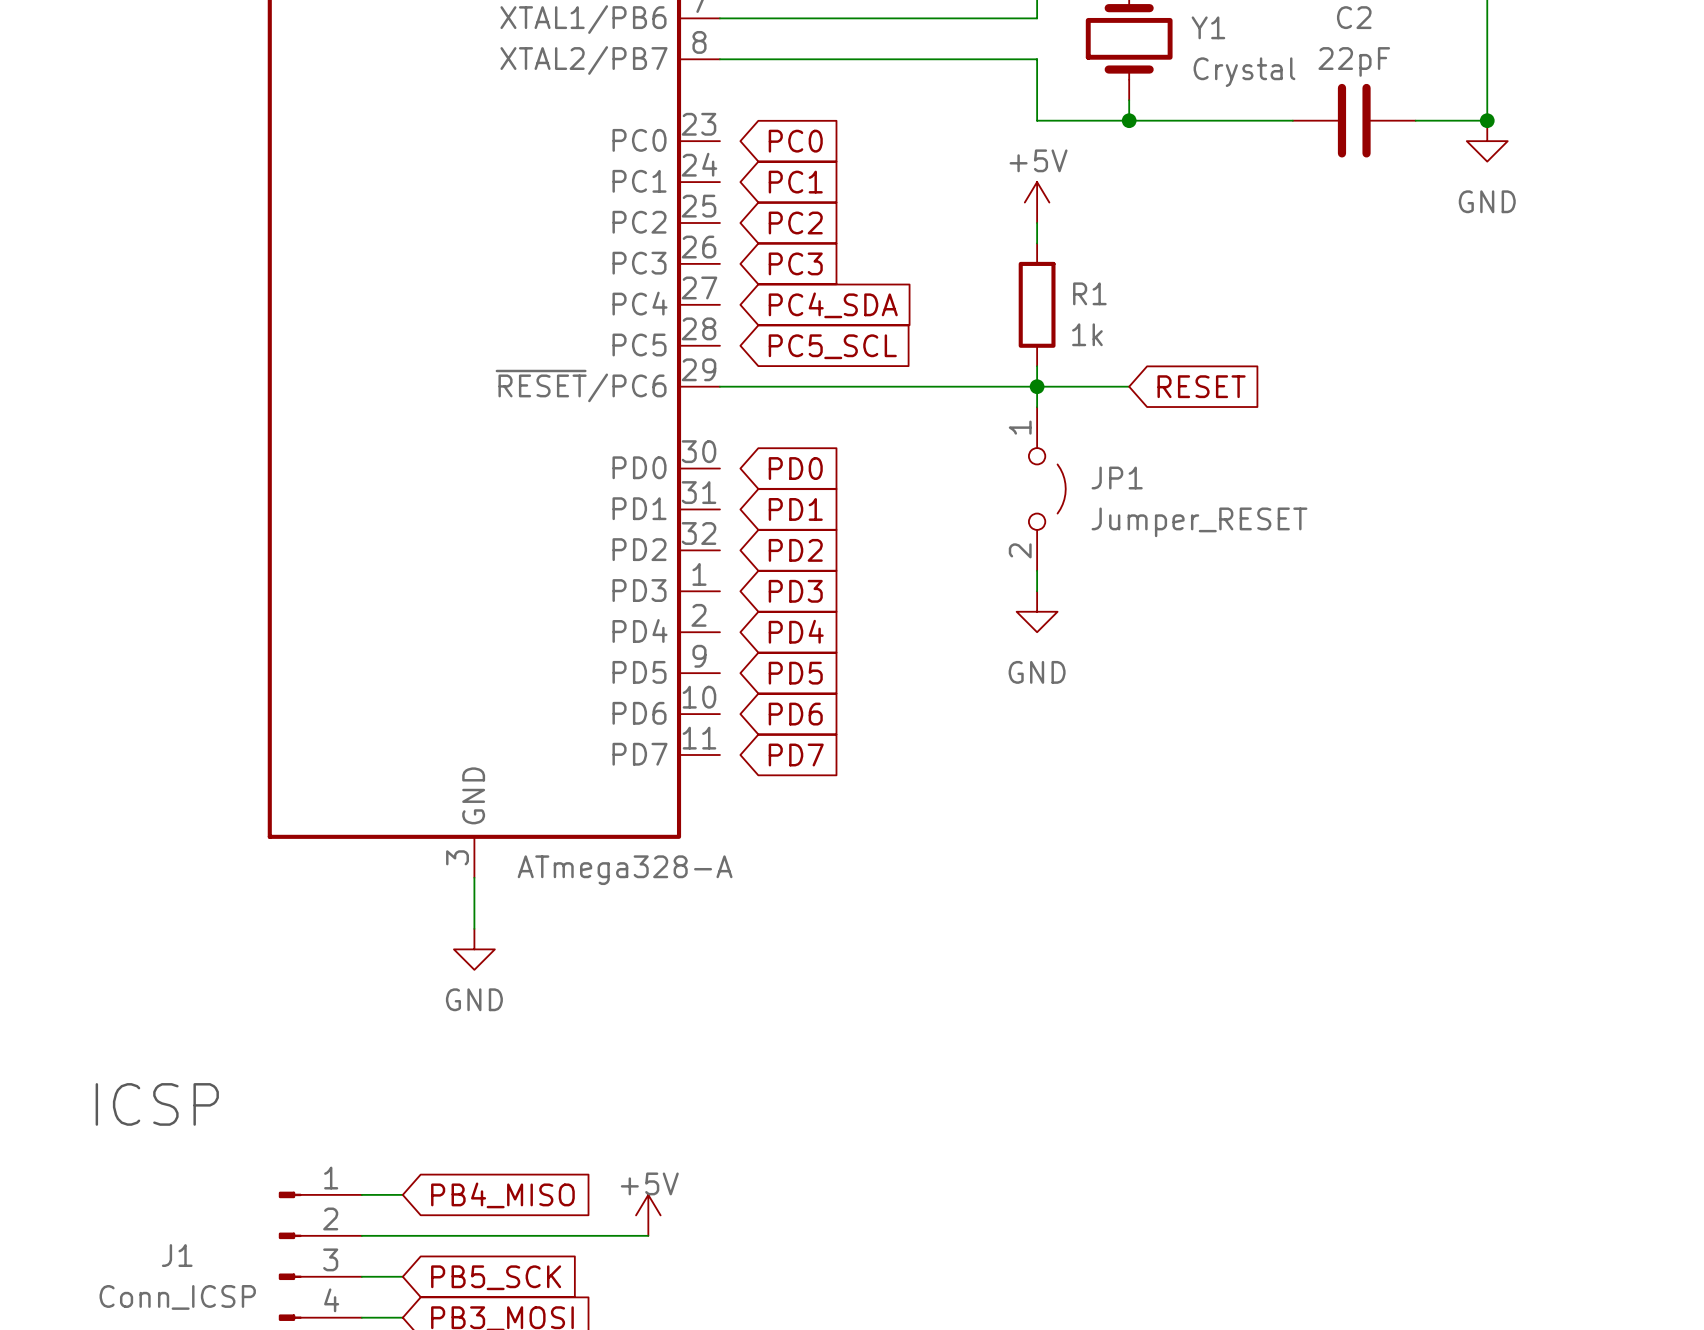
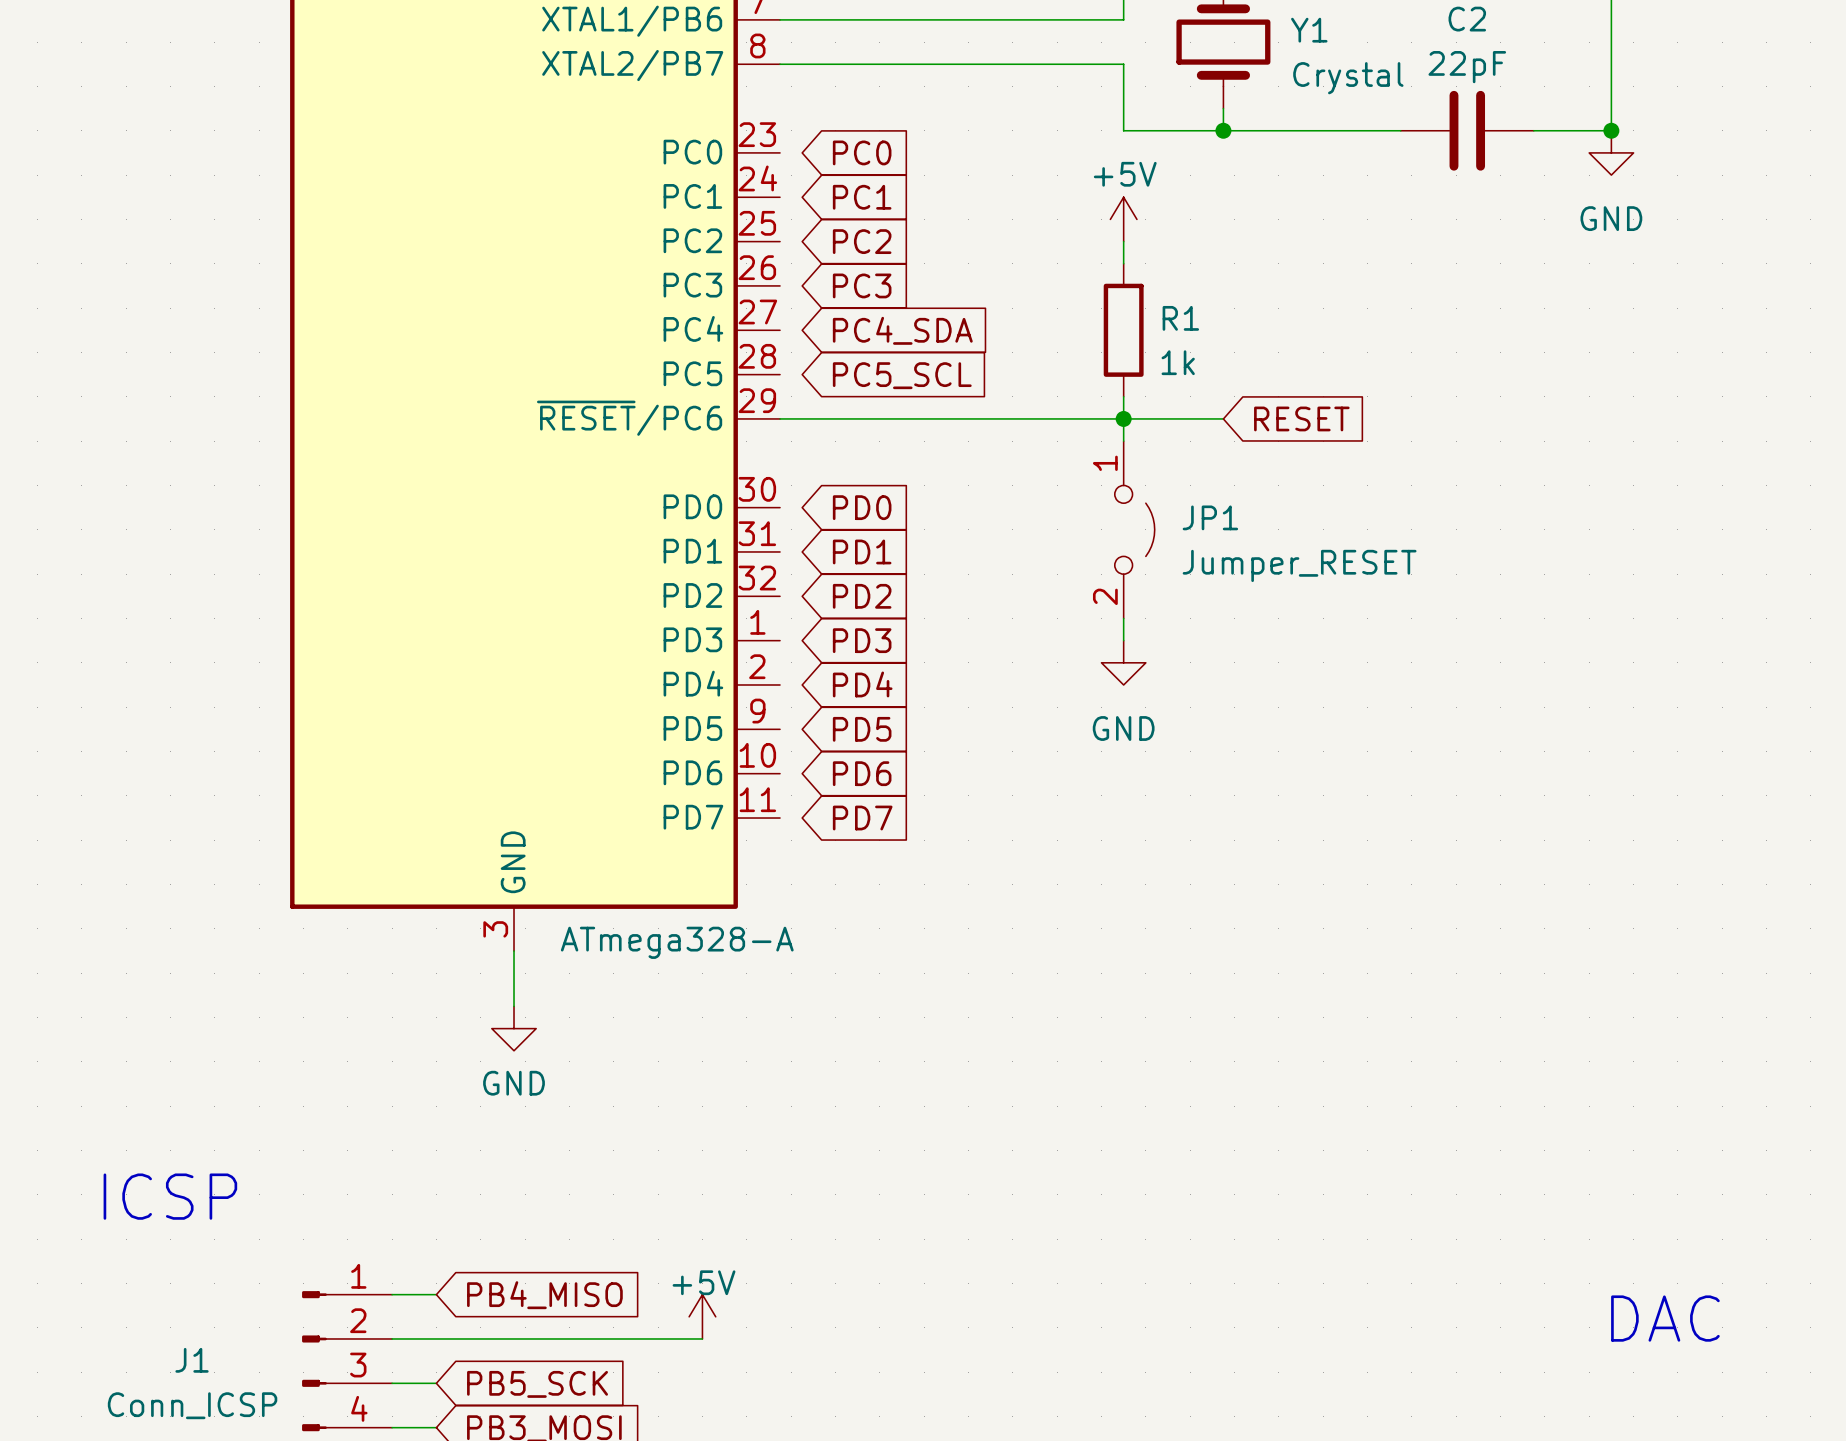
text: none -> DAC (1665, 1318)

